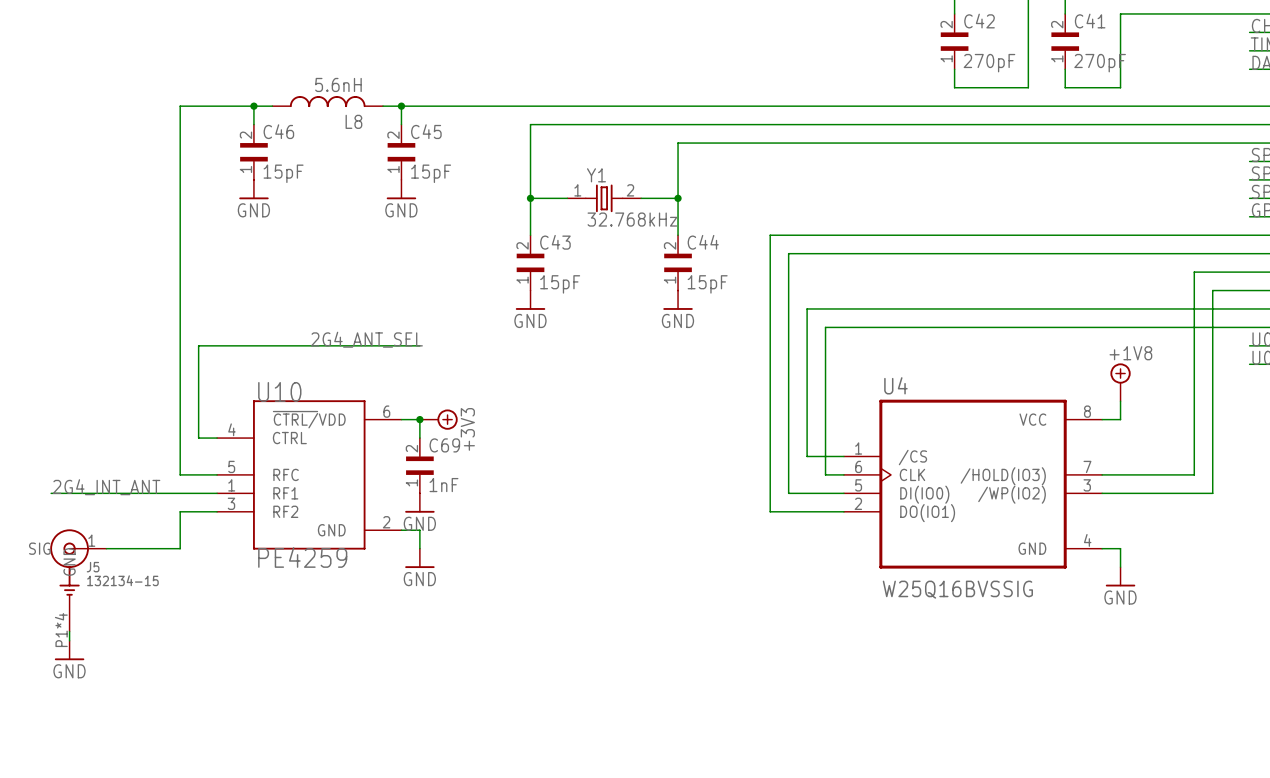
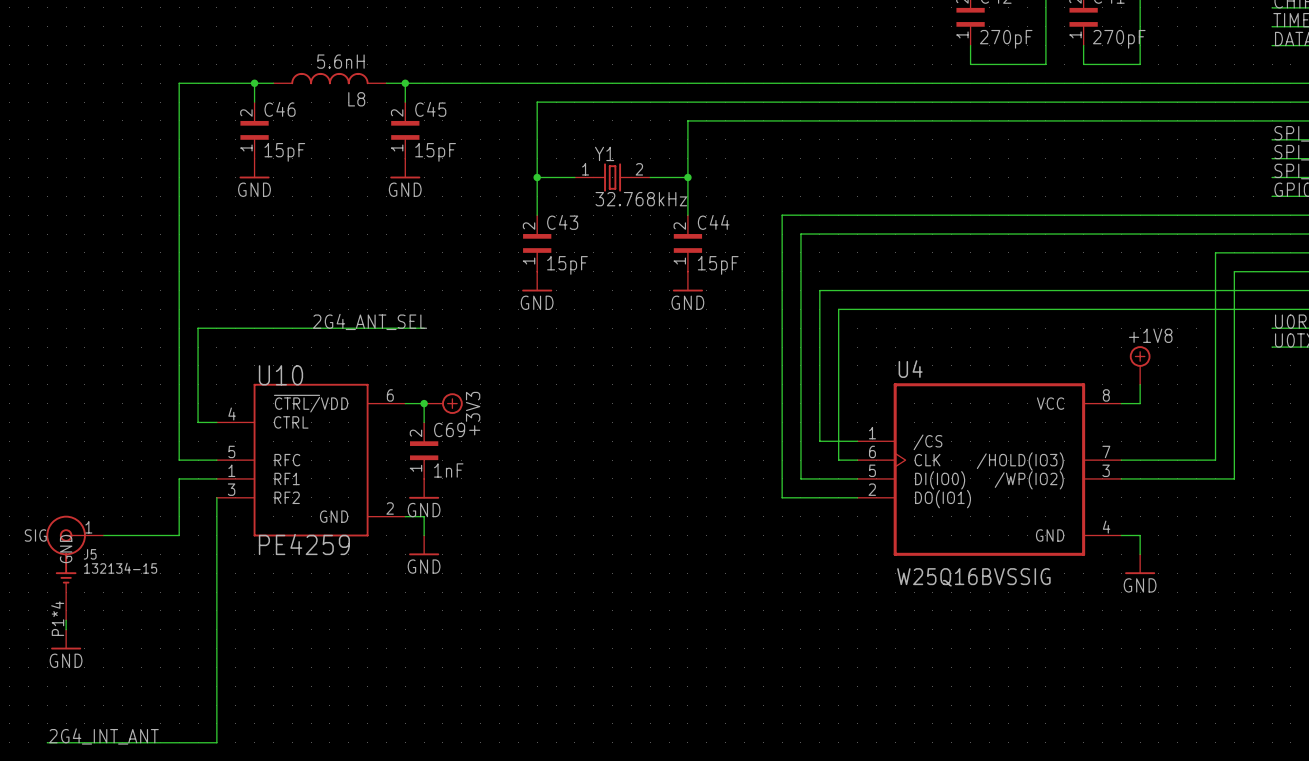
label: 2G4_INT_ANT (106, 487) -> none
wire: (51, 493) (180, 493) -> none
wire: (180, 511) (217, 511) -> (179, 497) (179, 478)
wire: none -> (216, 497) (216, 742) (47, 742)
label: none -> 2G4_INT_ANT (103, 736)

